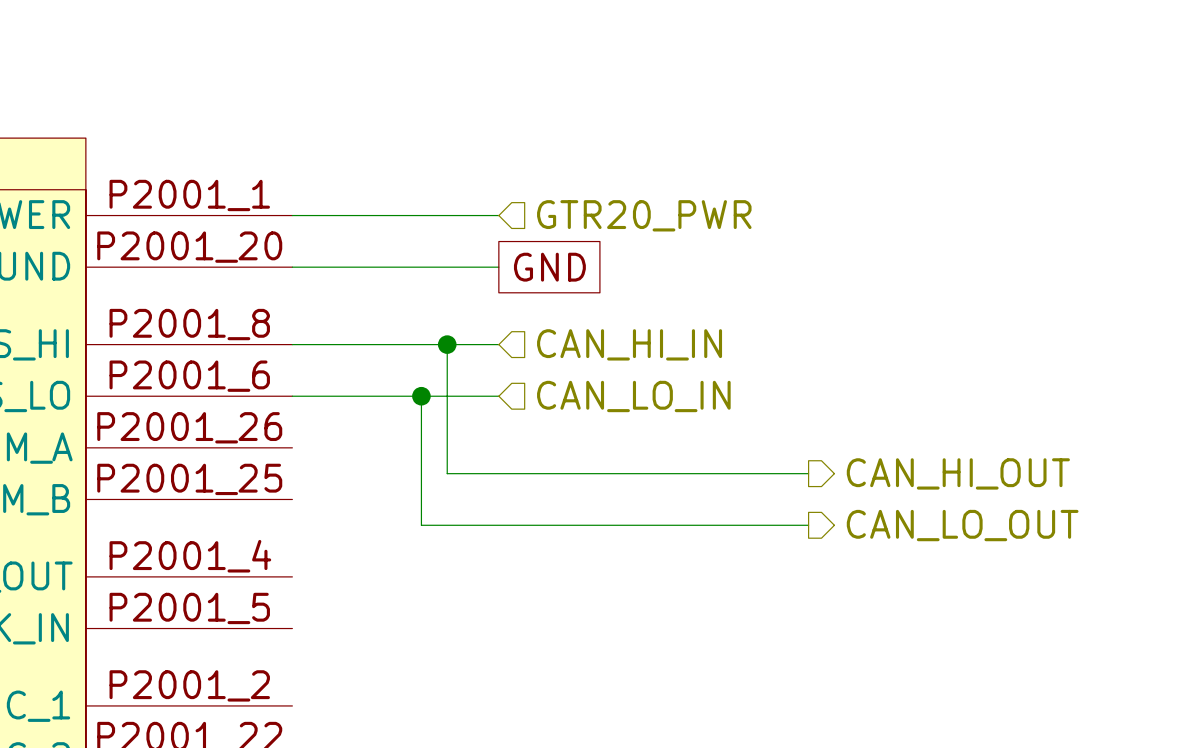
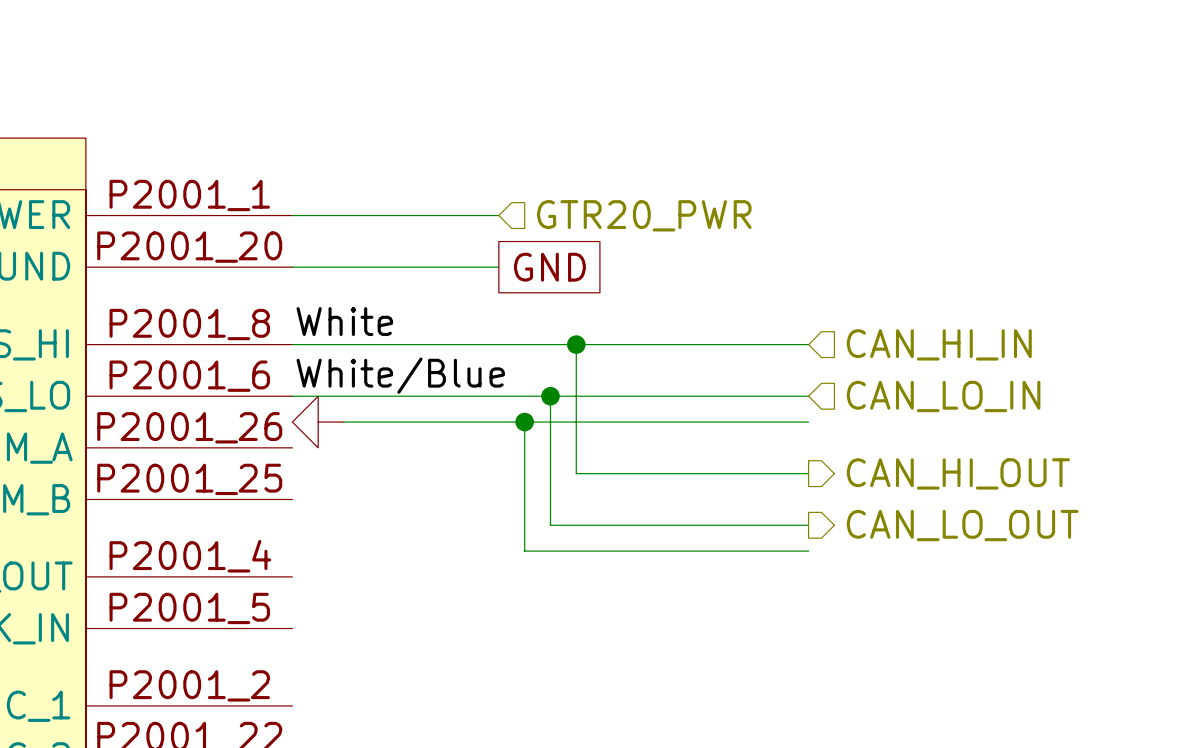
label: none -> White (344, 321)
wire: (447, 344) (447, 473) (576, 473) -> (576, 344) (576, 473)
junction: (447, 344) -> none
wire: none -> (498, 344) (808, 344)
junction: none -> (576, 344)
hierarchical label position: CAN_HI_IN (629, 344) -> CAN_HI_IN (939, 344)
label: none -> White/Blue (400, 375)
wire: (421, 396) (421, 525) (550, 525) -> (550, 396) (550, 525)
junction: (421, 396) -> none
wire: none -> (498, 396) (808, 396)
junction: none -> (550, 396)
hierarchical label position: CAN_LO_IN (633, 396) -> CAN_LO_IN (943, 396)
power symbol: none -> (318, 422)
wire: none -> (343, 422) (808, 422)
wire: none -> (524, 422) (524, 551) (808, 551)
junction: none -> (524, 422)

